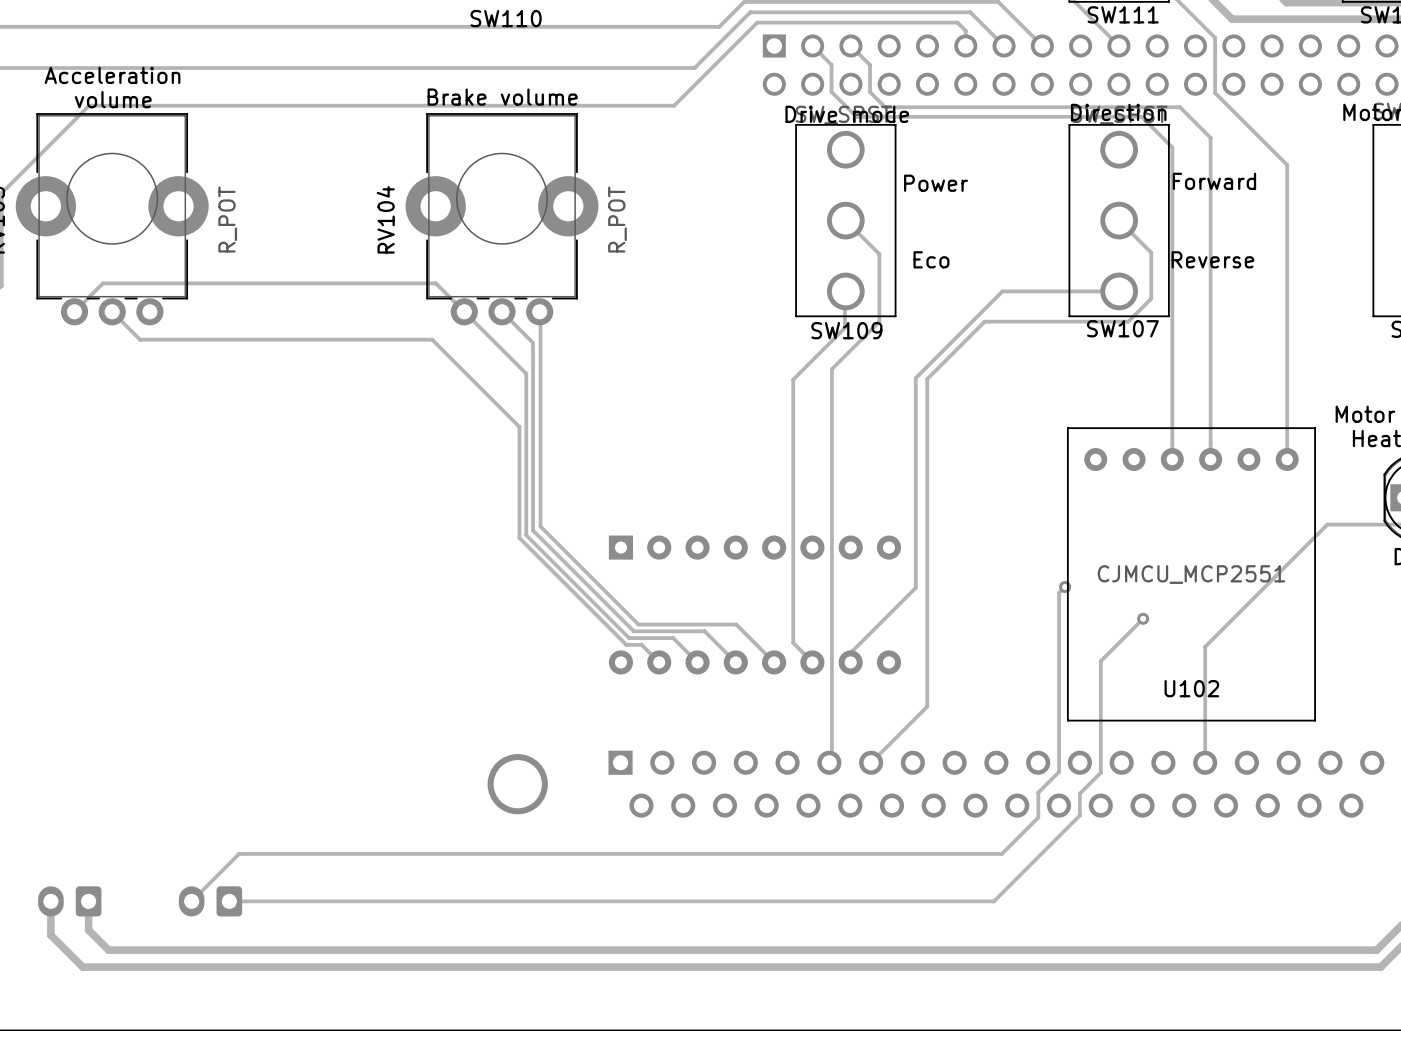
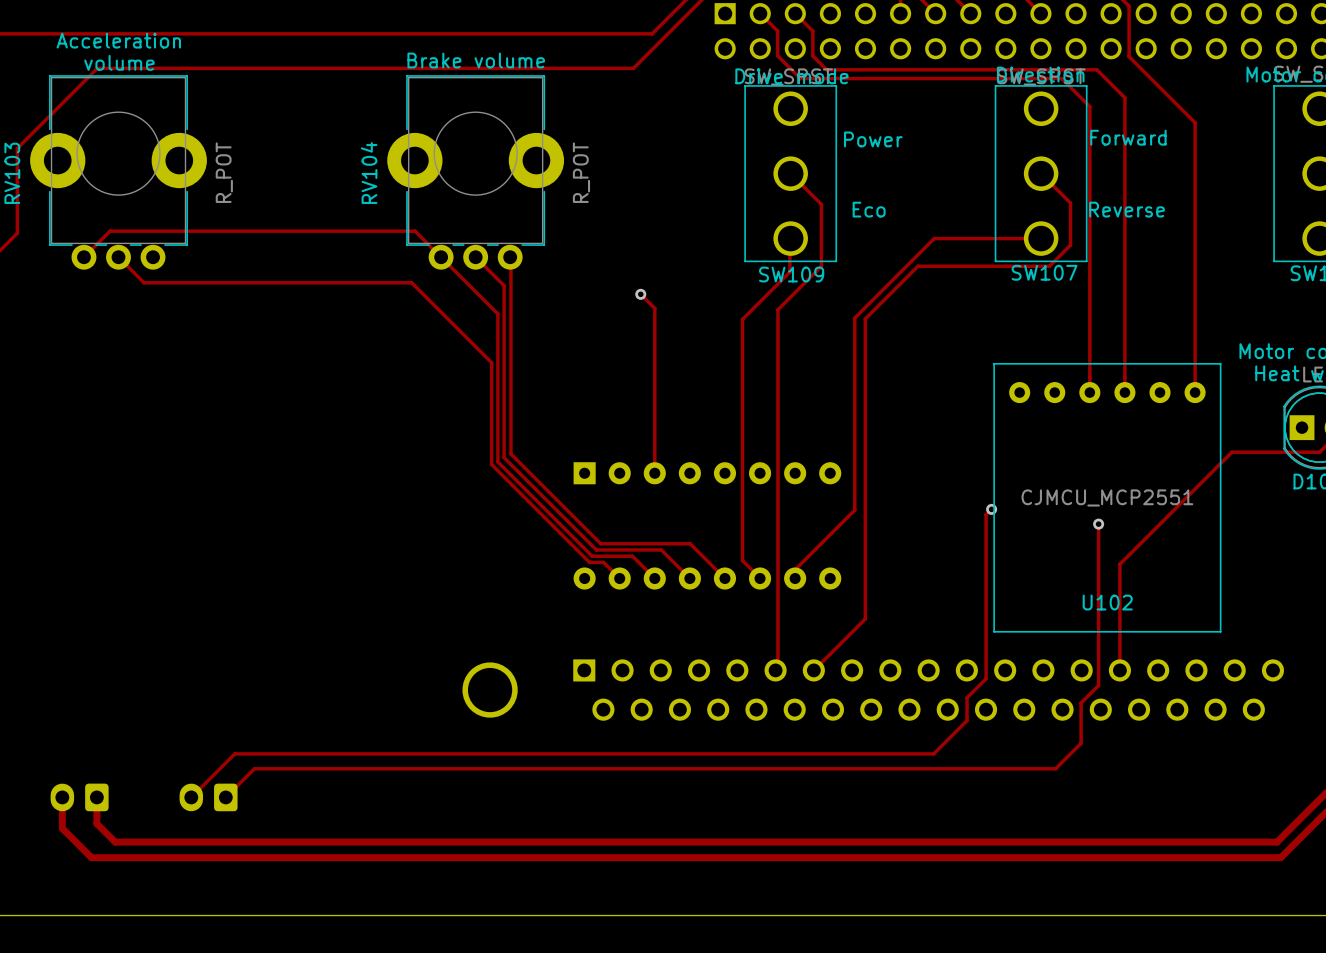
track: none -> (640, 294) (654, 308) (654, 473)
via: none -> (640, 294)
track: (1143, 618) (1100, 661) (1100, 772) (1079, 793) (1079, 815) (993, 901) (229, 901) -> (1098, 524) (1098, 685) (1081, 703) (1081, 743) (1055, 768) (254, 768) (225, 797)
via position: (1143, 618) -> (1098, 524)

